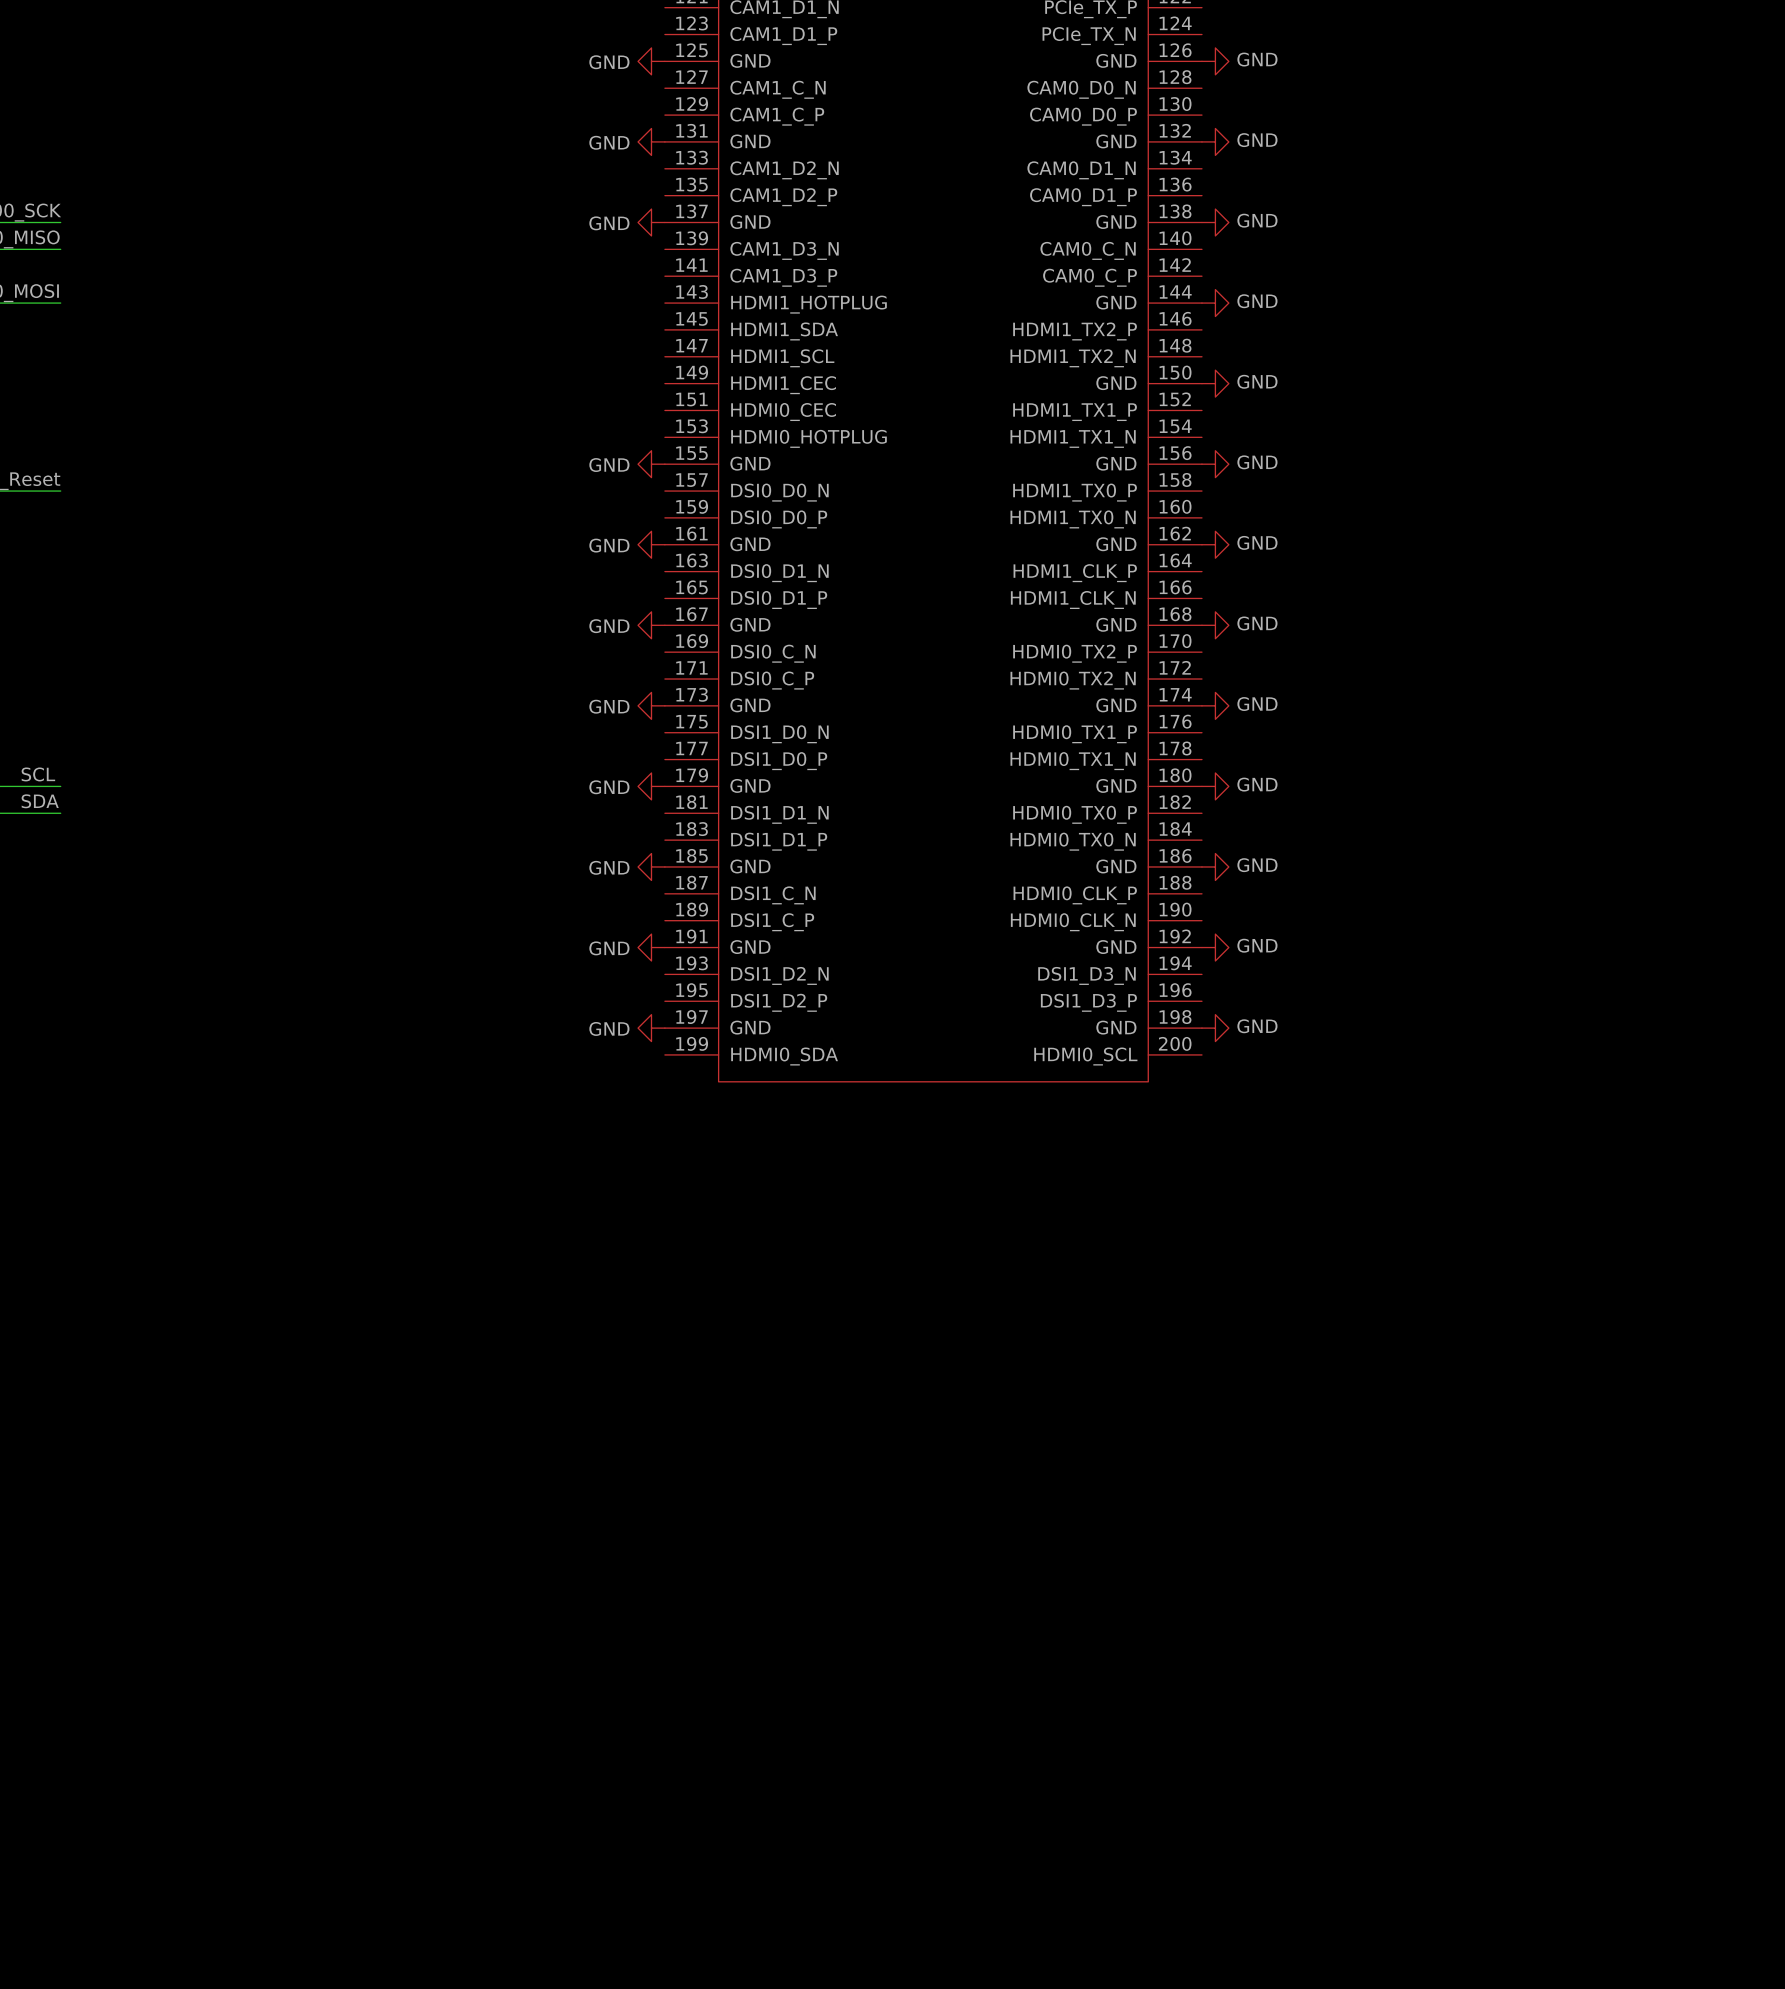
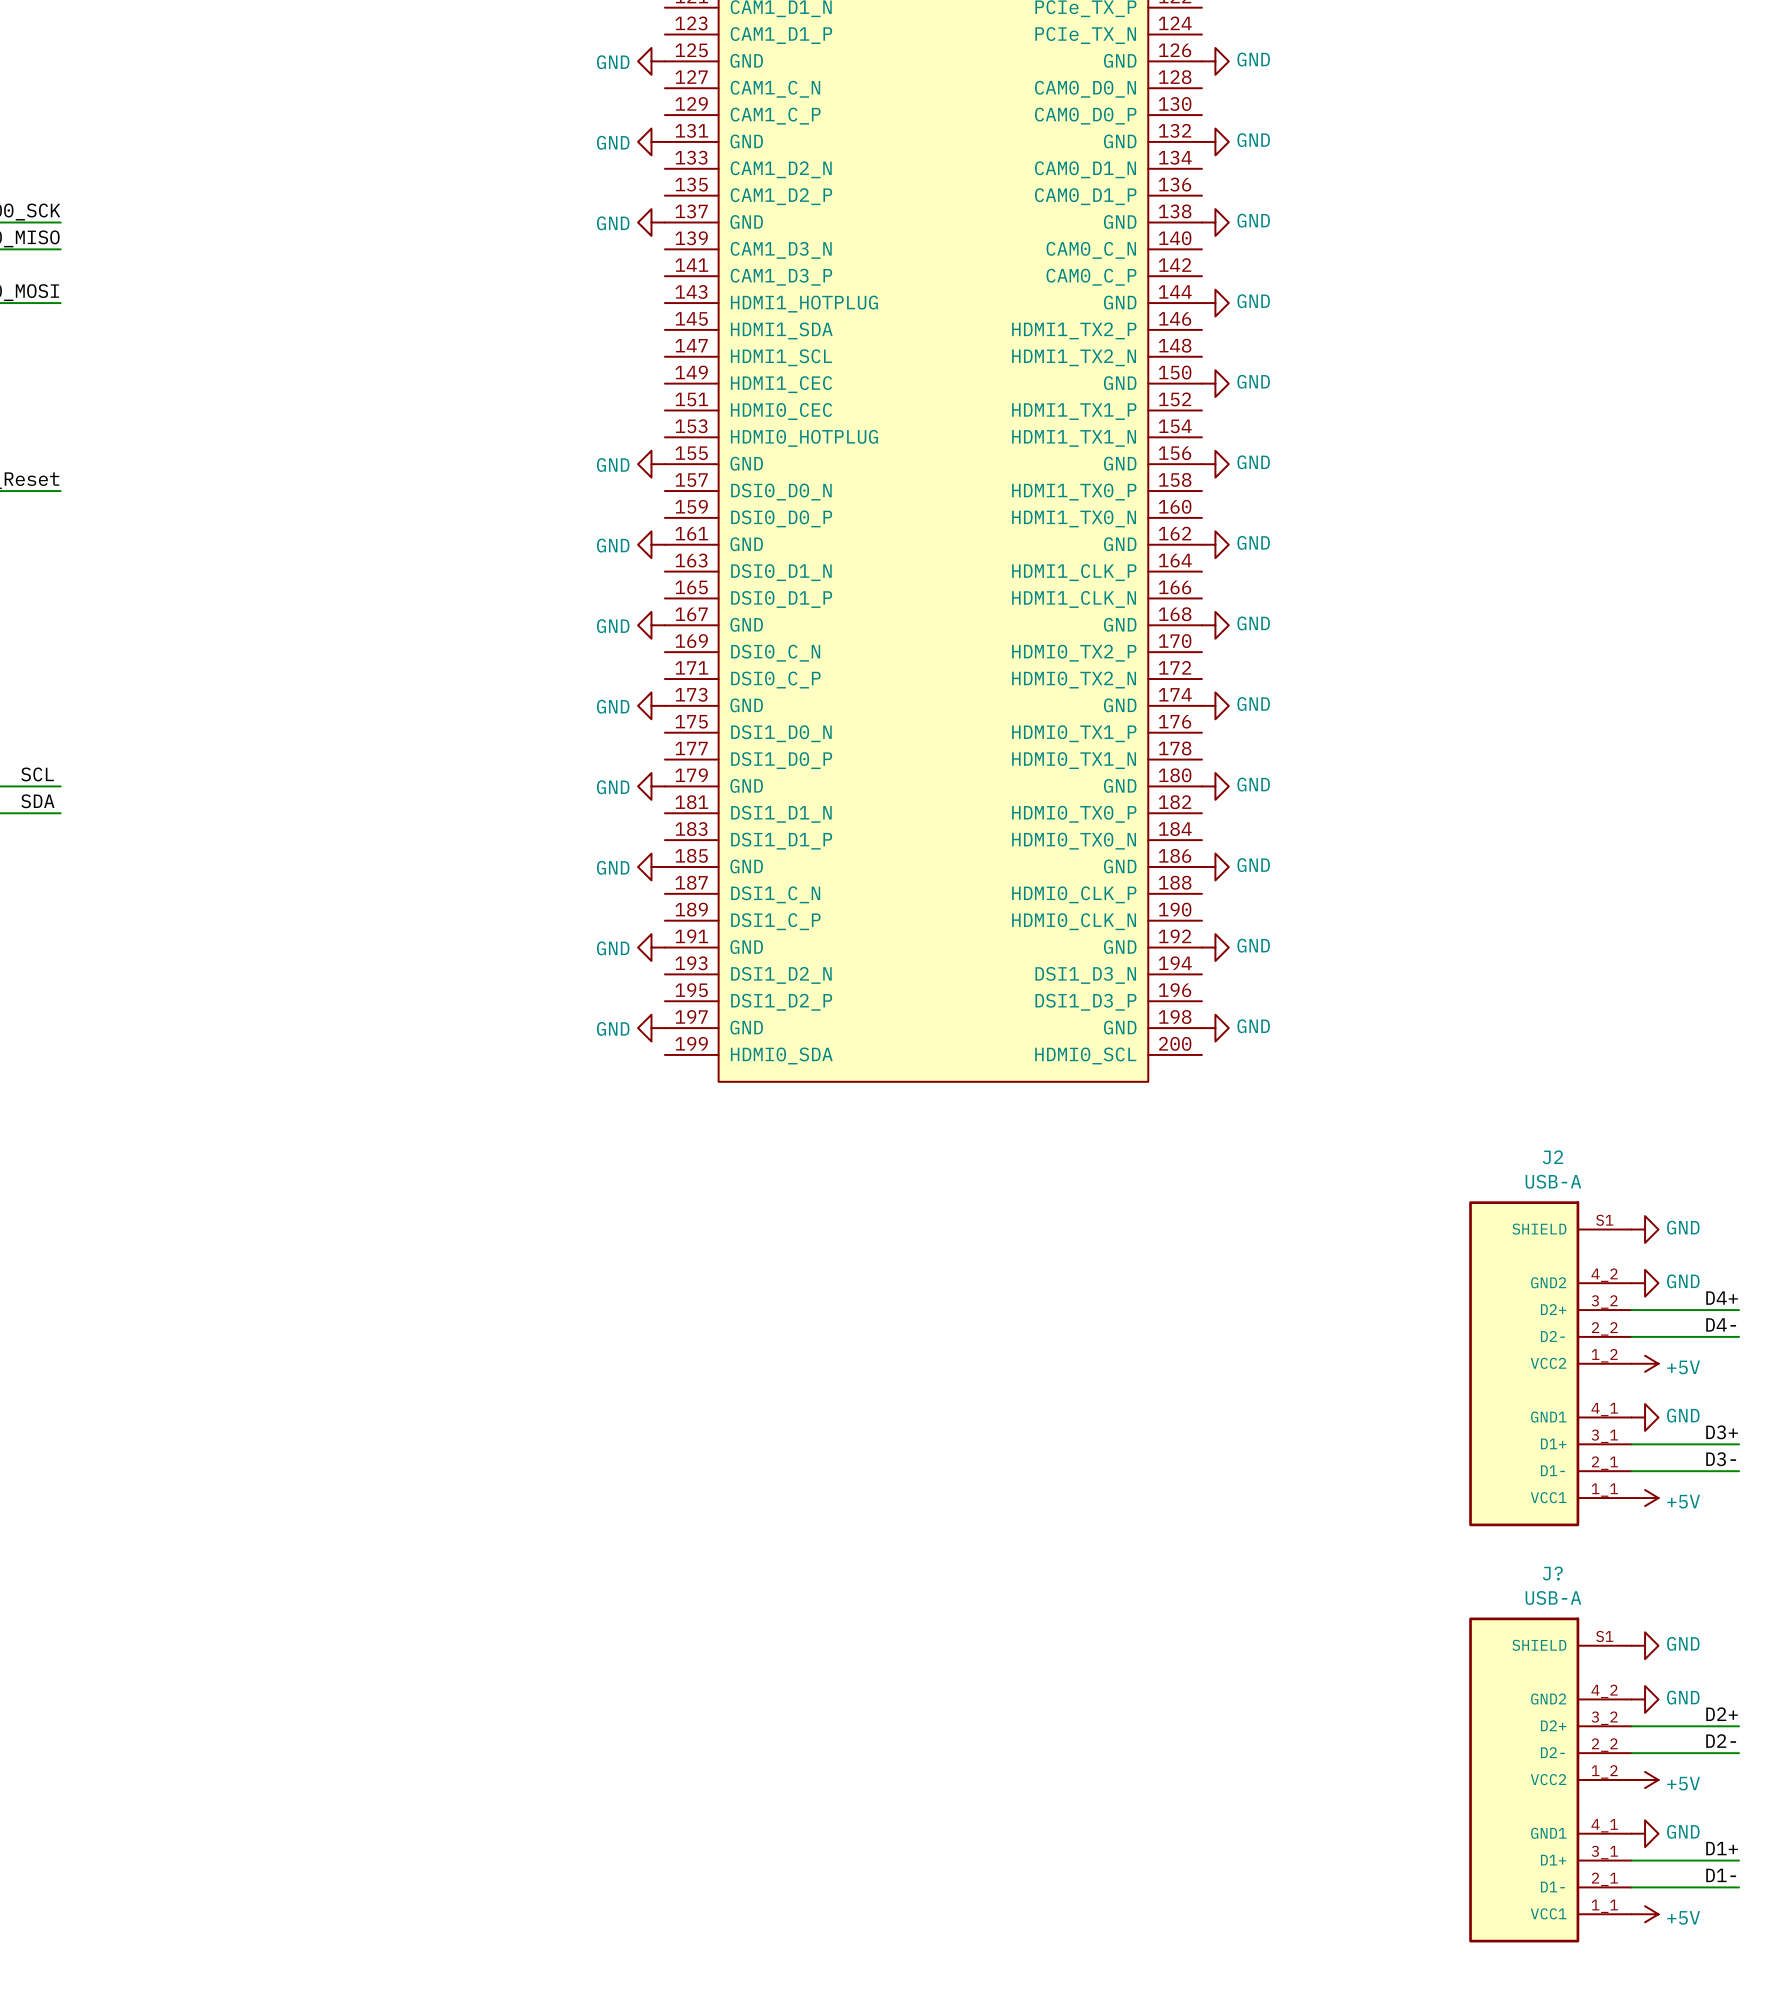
power symbol: none -> GND (1645, 1229)
power symbol: none -> GND (1645, 1283)
label: none -> D4+ (1722, 1298)
wire: none -> (1631, 1310) (1739, 1310)
label: none -> D4- (1721, 1324)
wire: none -> (1631, 1336) (1739, 1336)
J2: none -> USB-A (1550, 1363)
power symbol: none -> +5V (1645, 1363)
power symbol: none -> GND (1645, 1417)
label: none -> D3+ (1722, 1432)
wire: none -> (1631, 1444) (1739, 1444)
label: none -> D3- (1721, 1459)
wire: none -> (1631, 1471) (1739, 1471)
power symbol: none -> +5V (1645, 1498)
power symbol: none -> GND (1645, 1645)
power symbol: none -> GND (1645, 1699)
label: none -> D2+ (1722, 1714)
wire: none -> (1631, 1726) (1739, 1726)
label: none -> D2- (1721, 1741)
wire: none -> (1631, 1753) (1739, 1753)
J?: none -> USB-A (1550, 1780)
power symbol: none -> +5V (1645, 1780)
power symbol: none -> GND (1645, 1833)
label: none -> D1+ (1722, 1848)
wire: none -> (1631, 1860) (1739, 1860)
label: none -> D1- (1721, 1875)
wire: none -> (1631, 1887) (1739, 1887)
power symbol: none -> +5V (1645, 1914)

